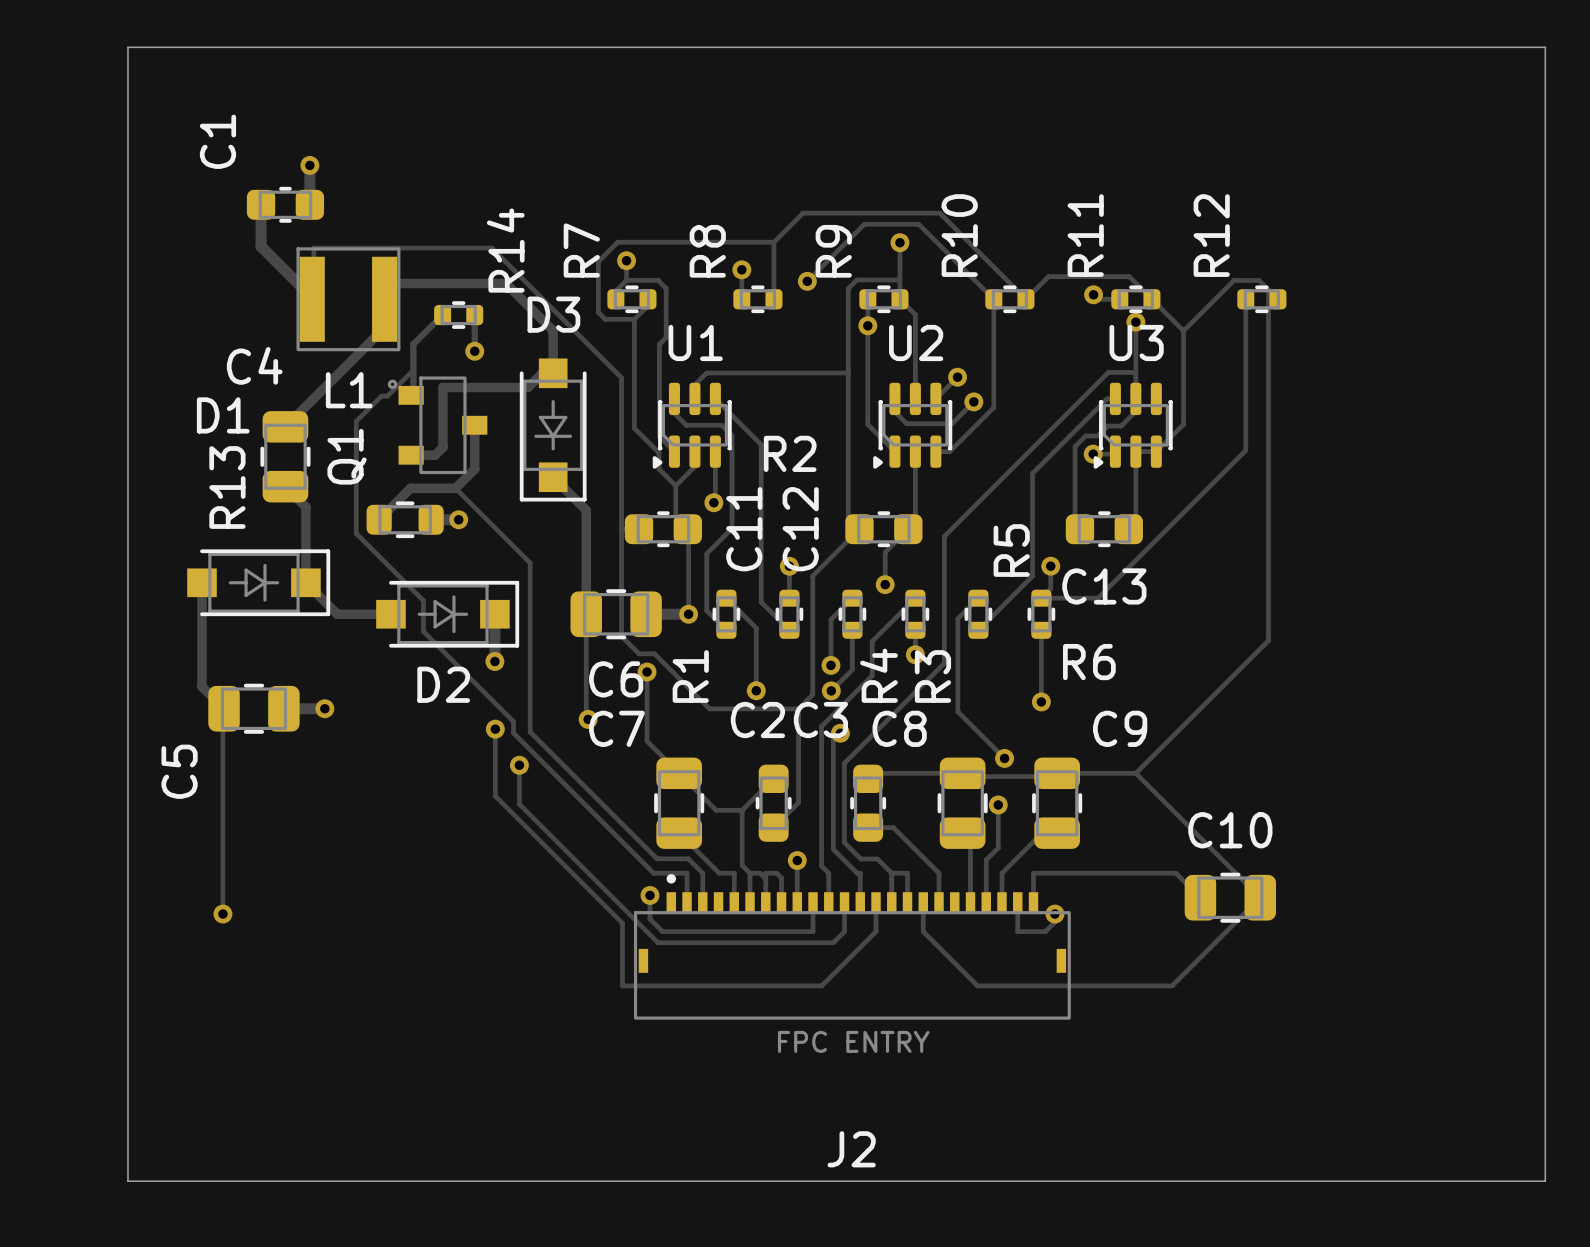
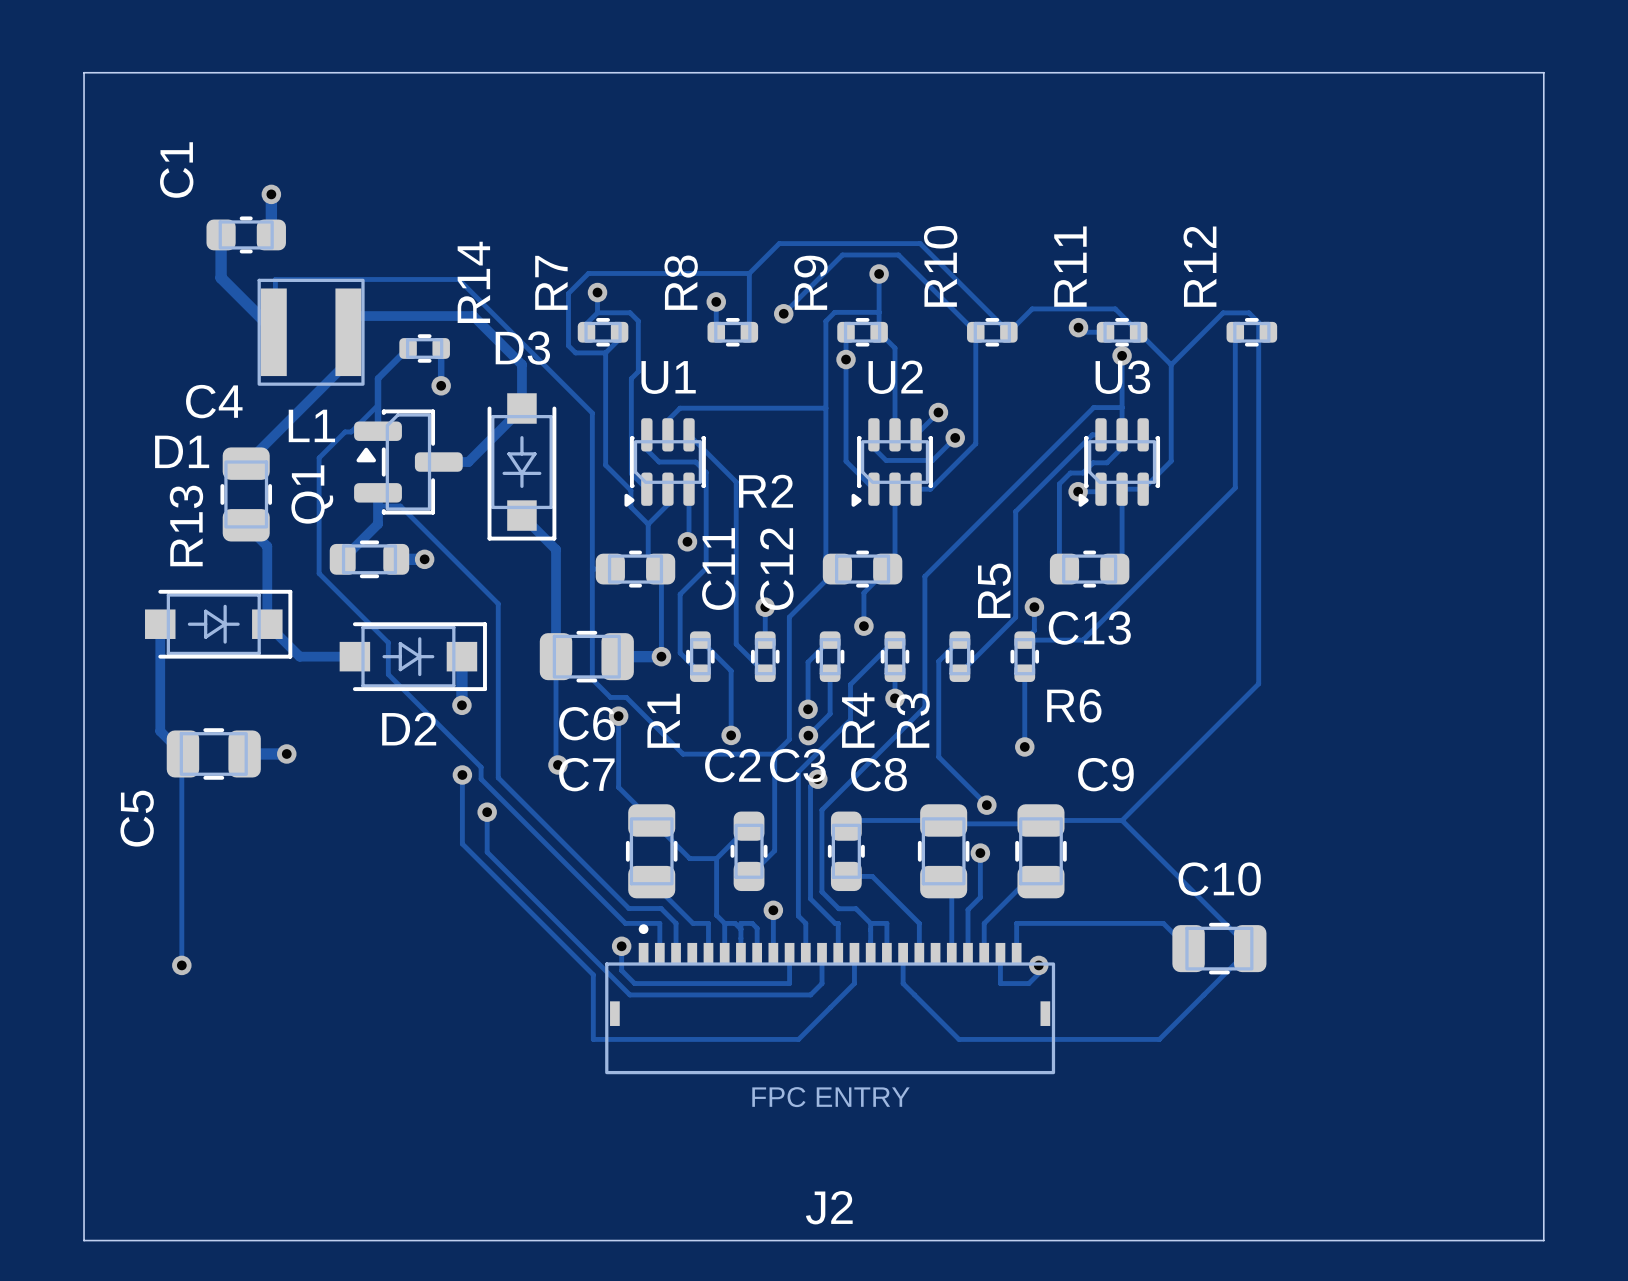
track: (553, 373) (542, 373) (527, 387) (442, 387) (442, 447) (435, 455) (411, 455) -> (521, 408) (468, 462) (438, 462)
Q1 footprint: [387, 376, 488, 475] -> [354, 409, 463, 515]
track: (474, 425) (474, 469) (455, 488) (410, 488) -> (378, 492) (378, 524) (375, 526)
track: none -> (378, 506) (400, 506) (421, 526)

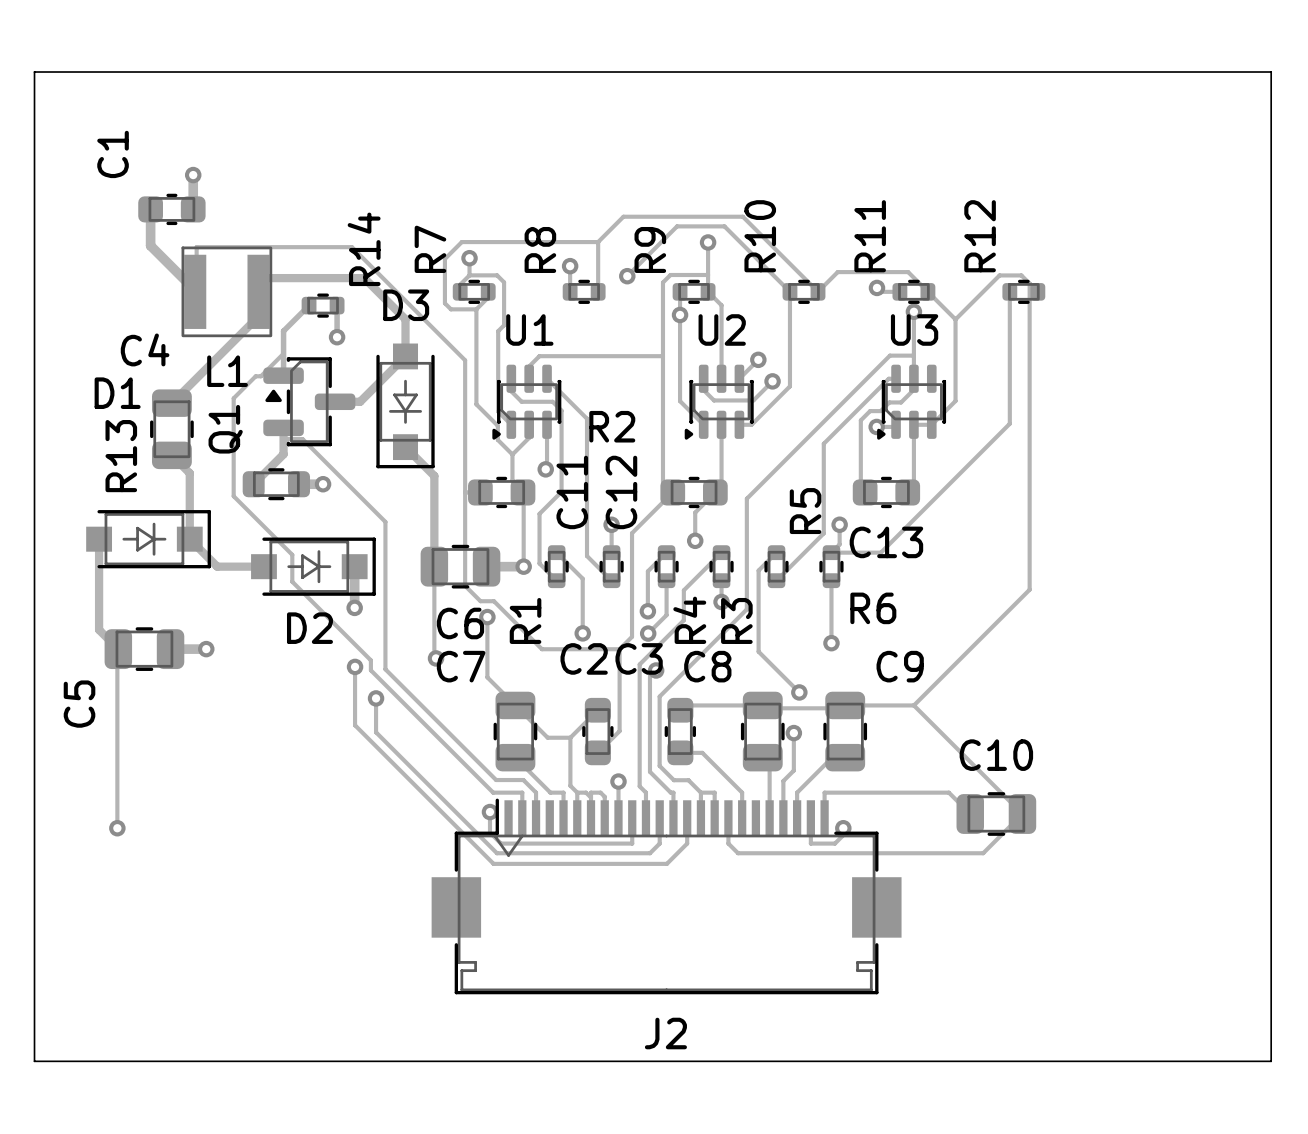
J2 footprint: [605, 924, 1056, 1075] -> [431, 798, 902, 995]
track: (593, 974) (593, 1039) (798, 1039) (830, 1007) -> (465, 836) (493, 863) (666, 863)
track: (914, 994) (959, 1039) (1159, 1039) (1203, 994) -> (738, 853) (983, 853)

